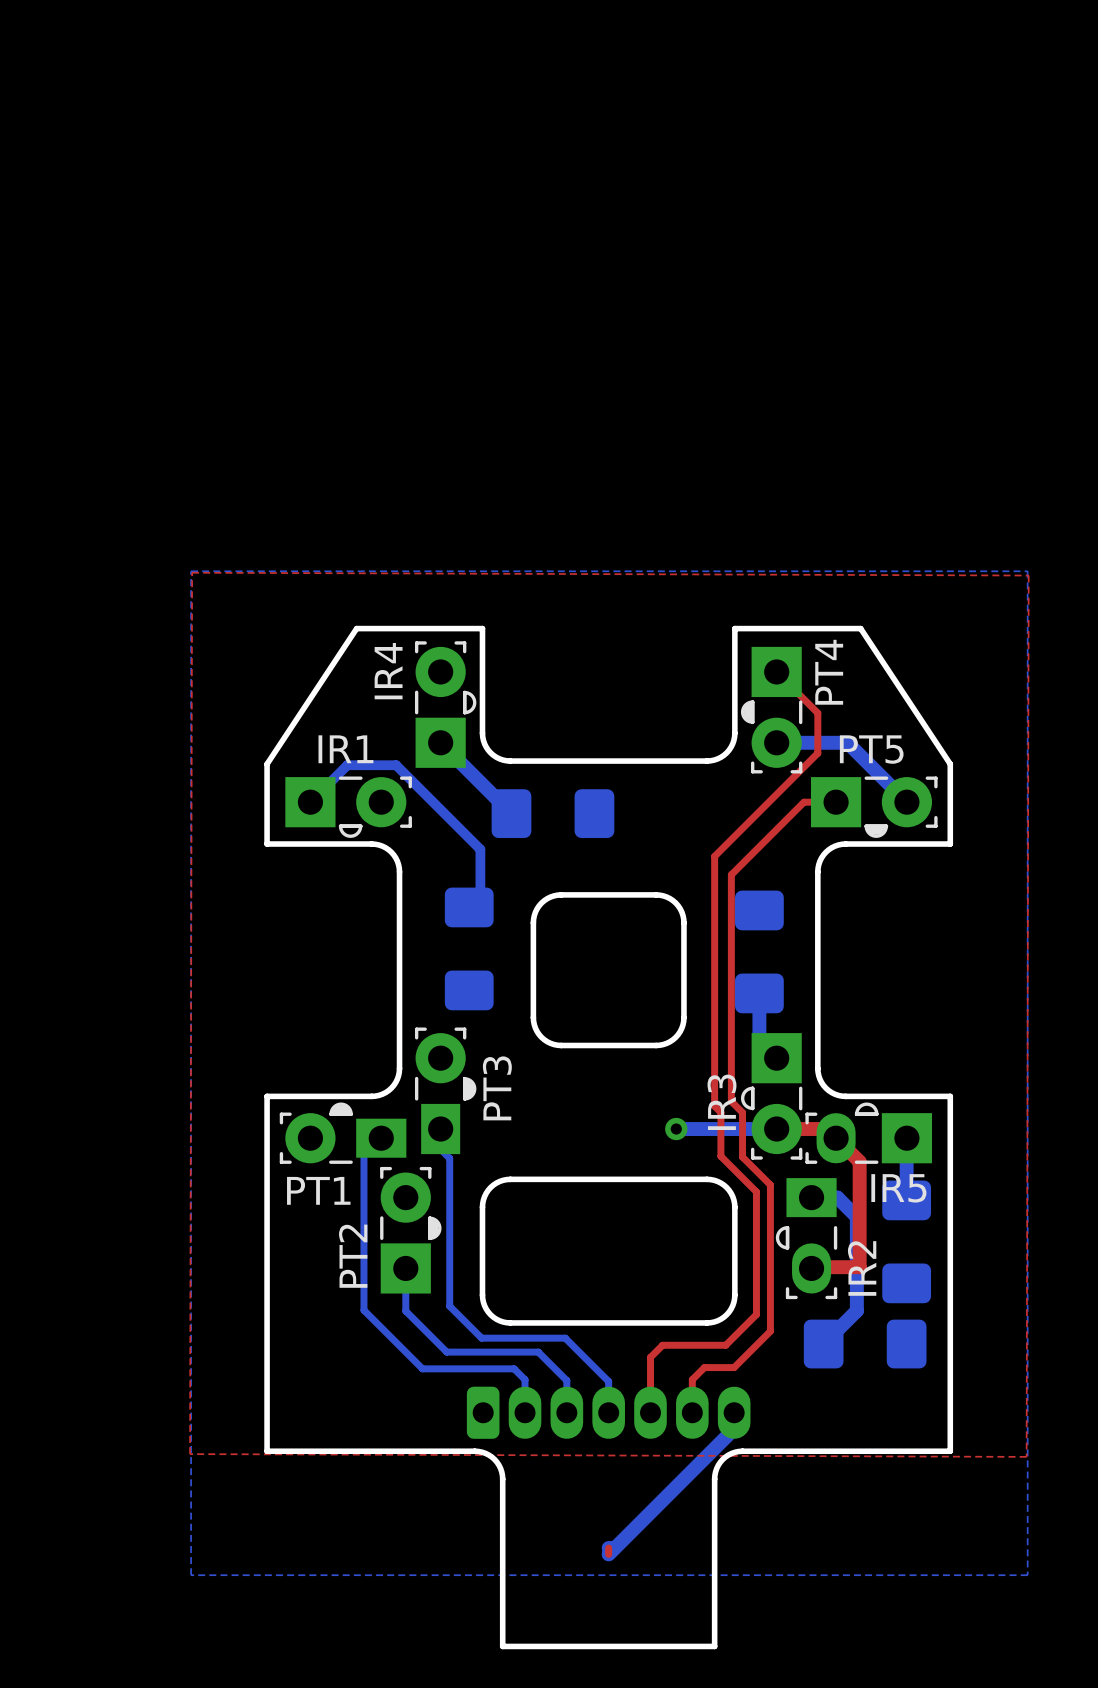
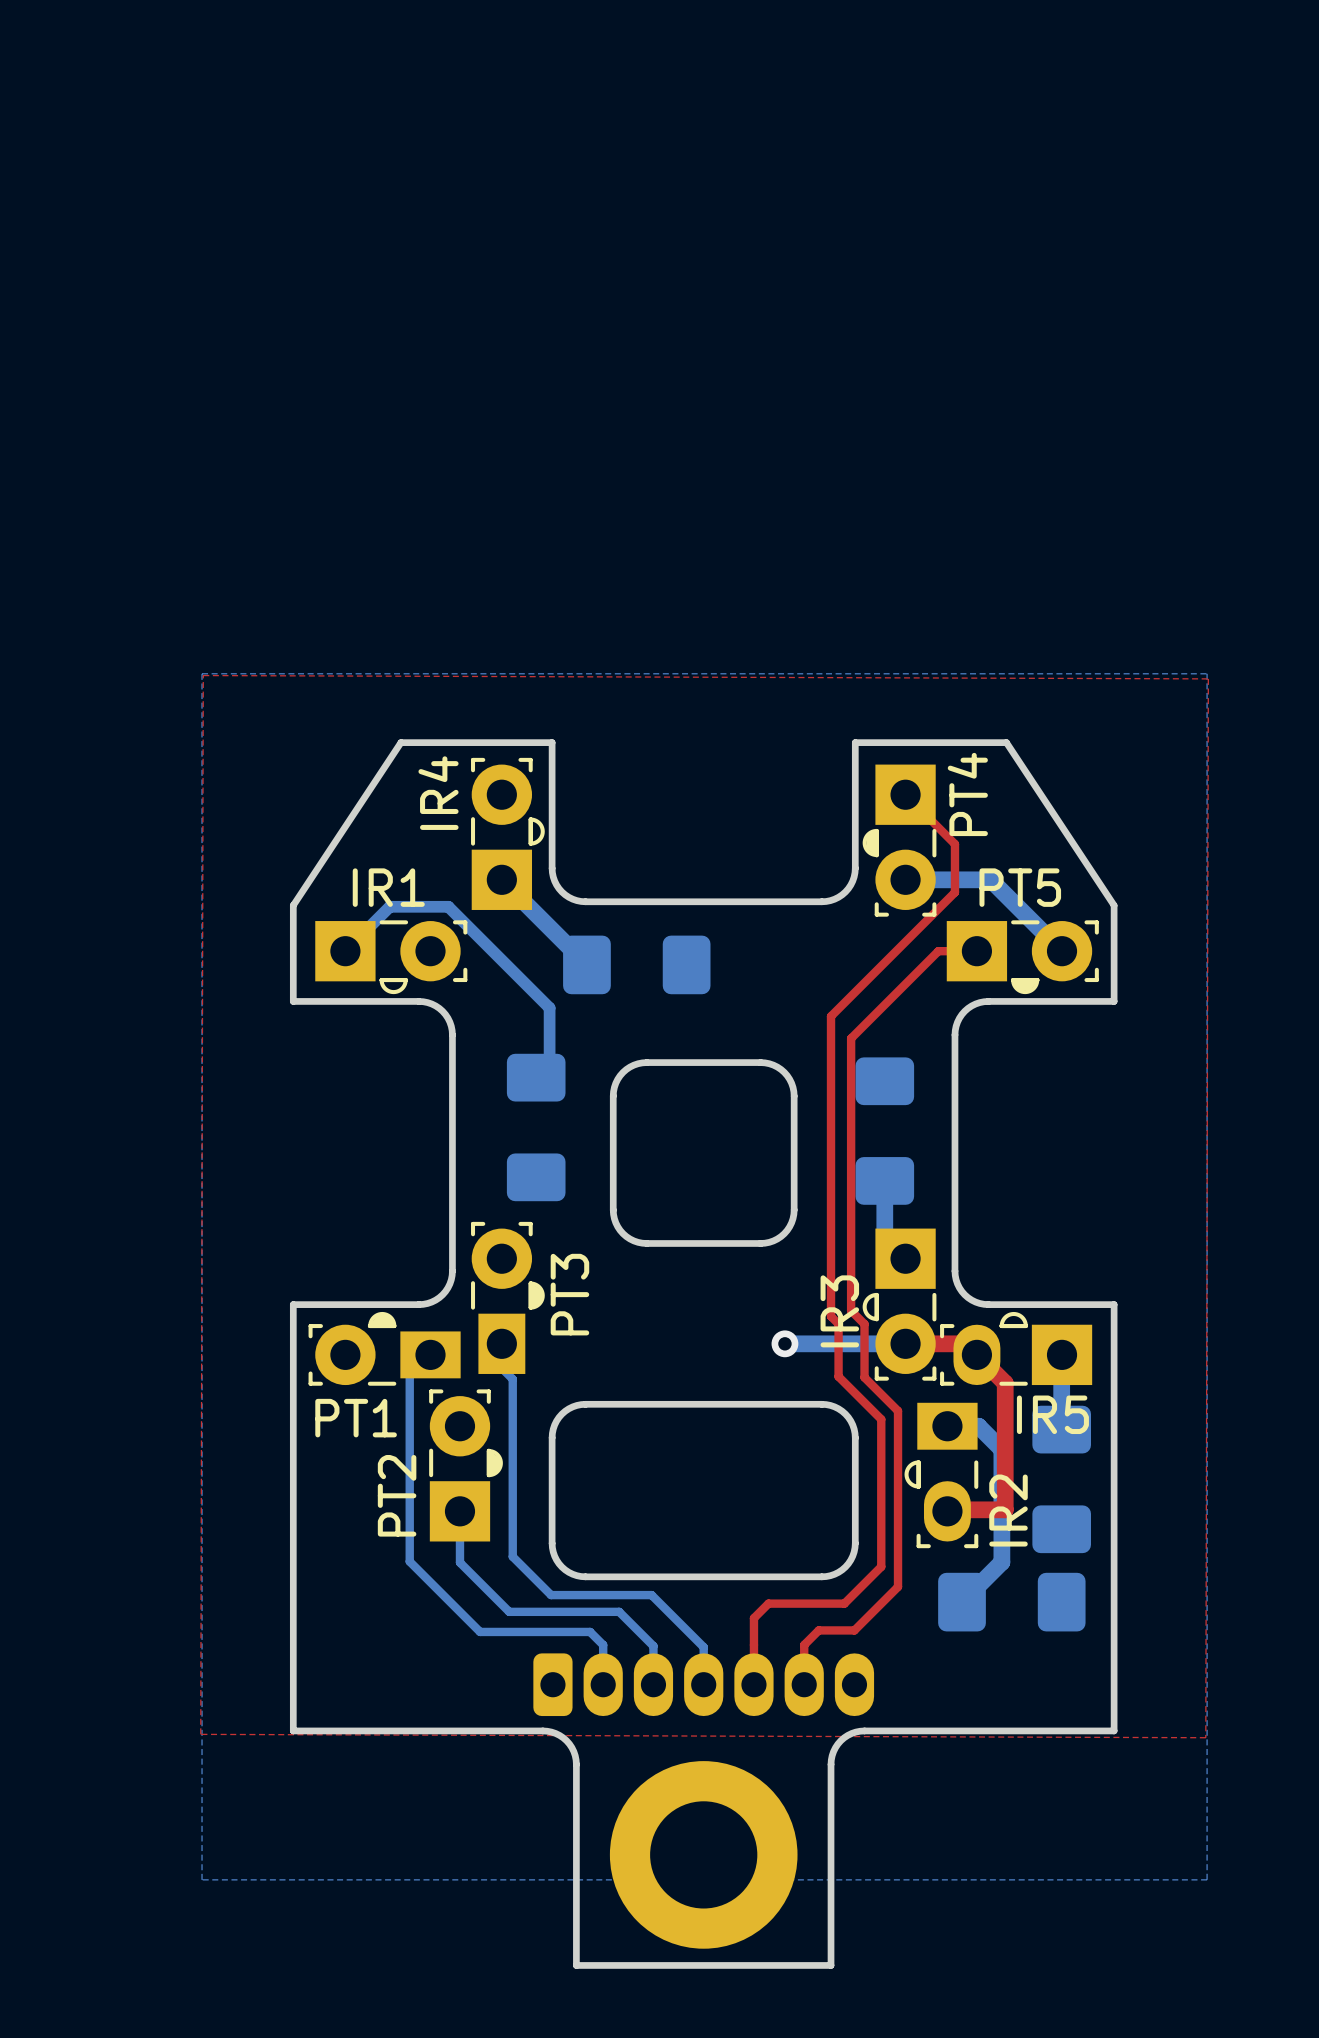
bottom track: (734, 1412) (734, 1428) (608, 1554) -> none
part: none -> (703, 1854)

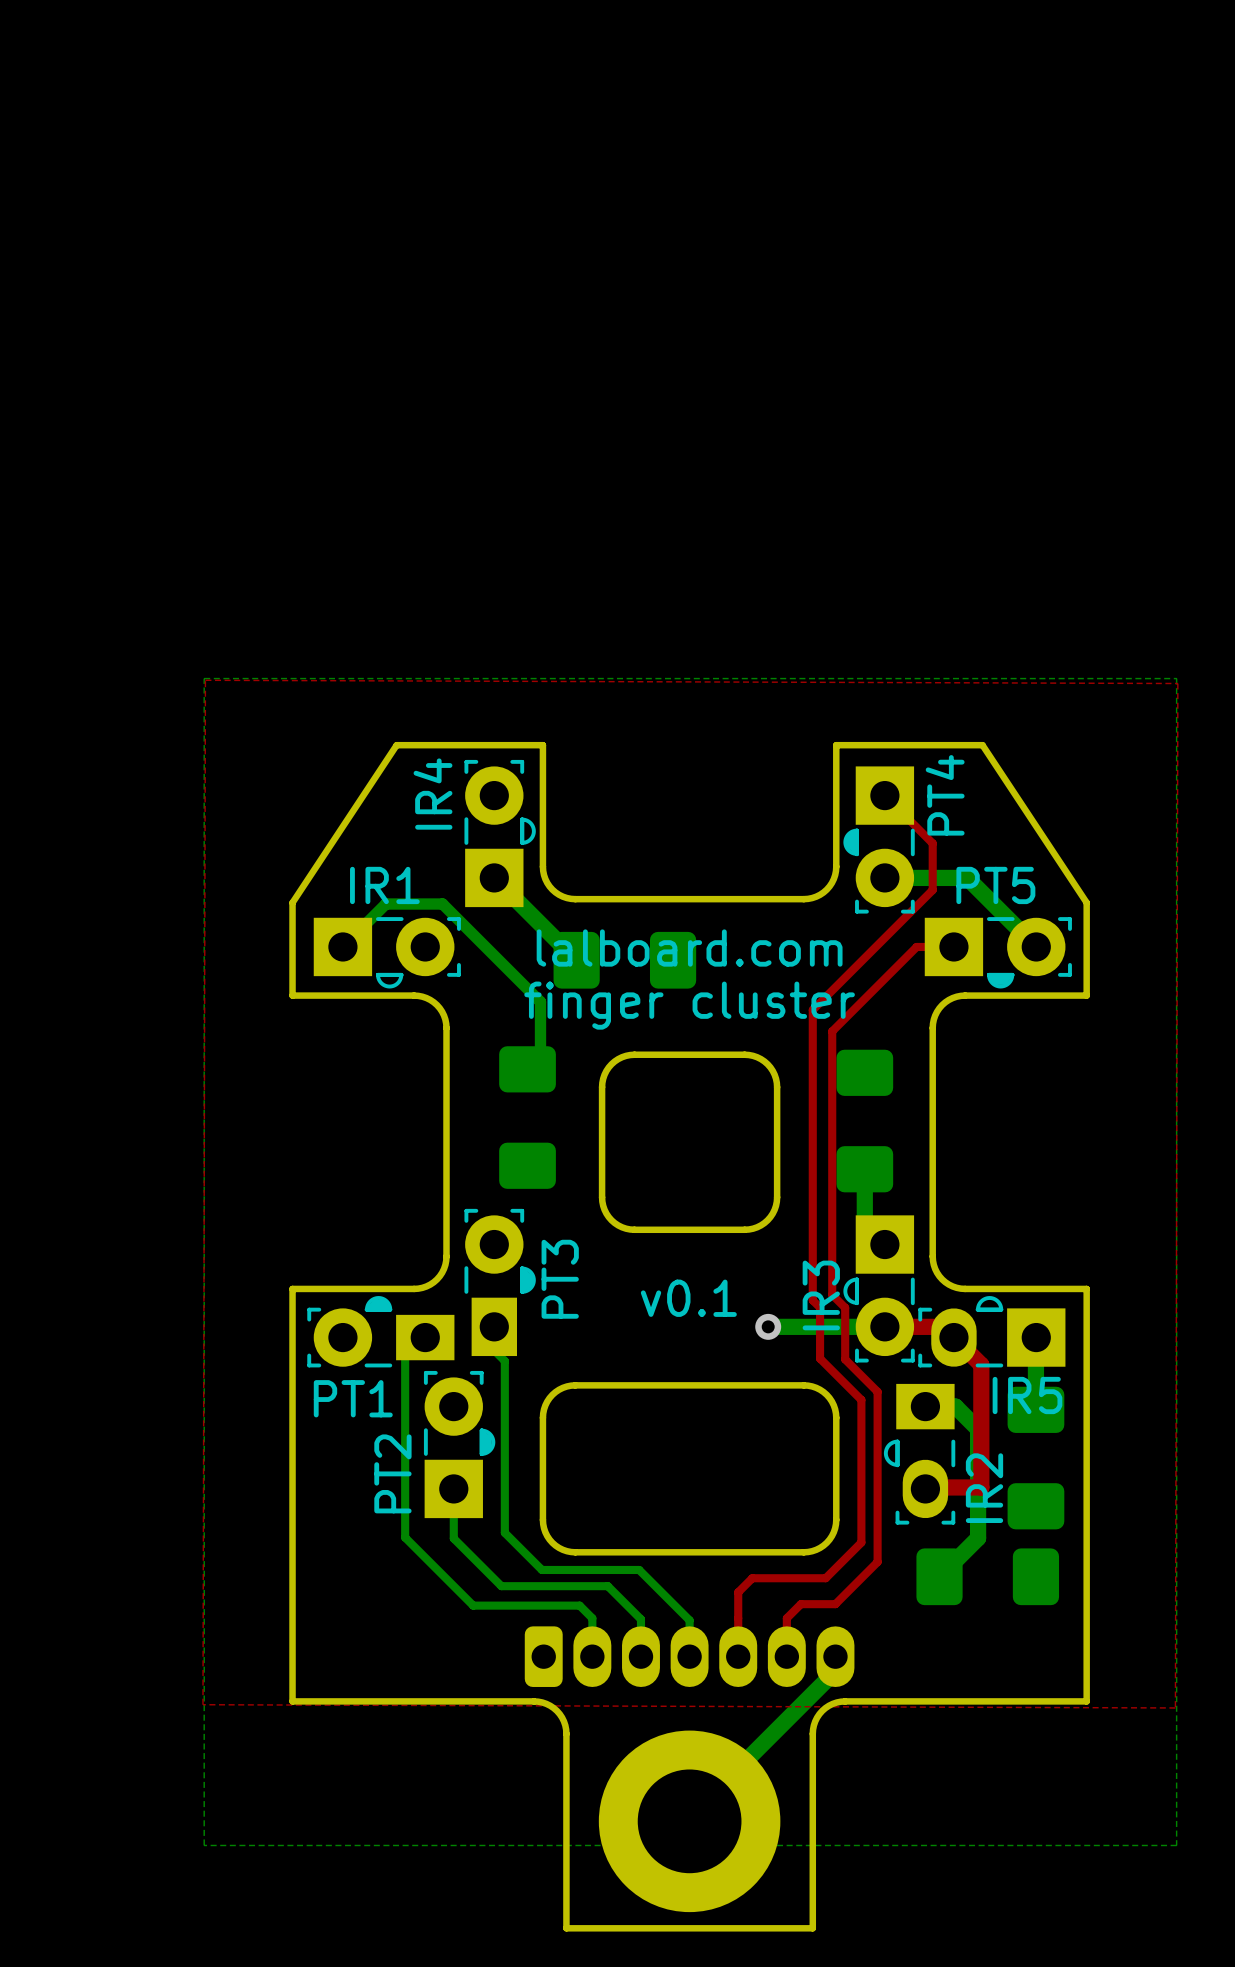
text: none -> lalboard.com (689, 948)
text: none -> finger cluster (689, 1005)
text: none -> v0.1 (688, 1298)
bottom track: none -> (835, 1671) (692, 1813)

